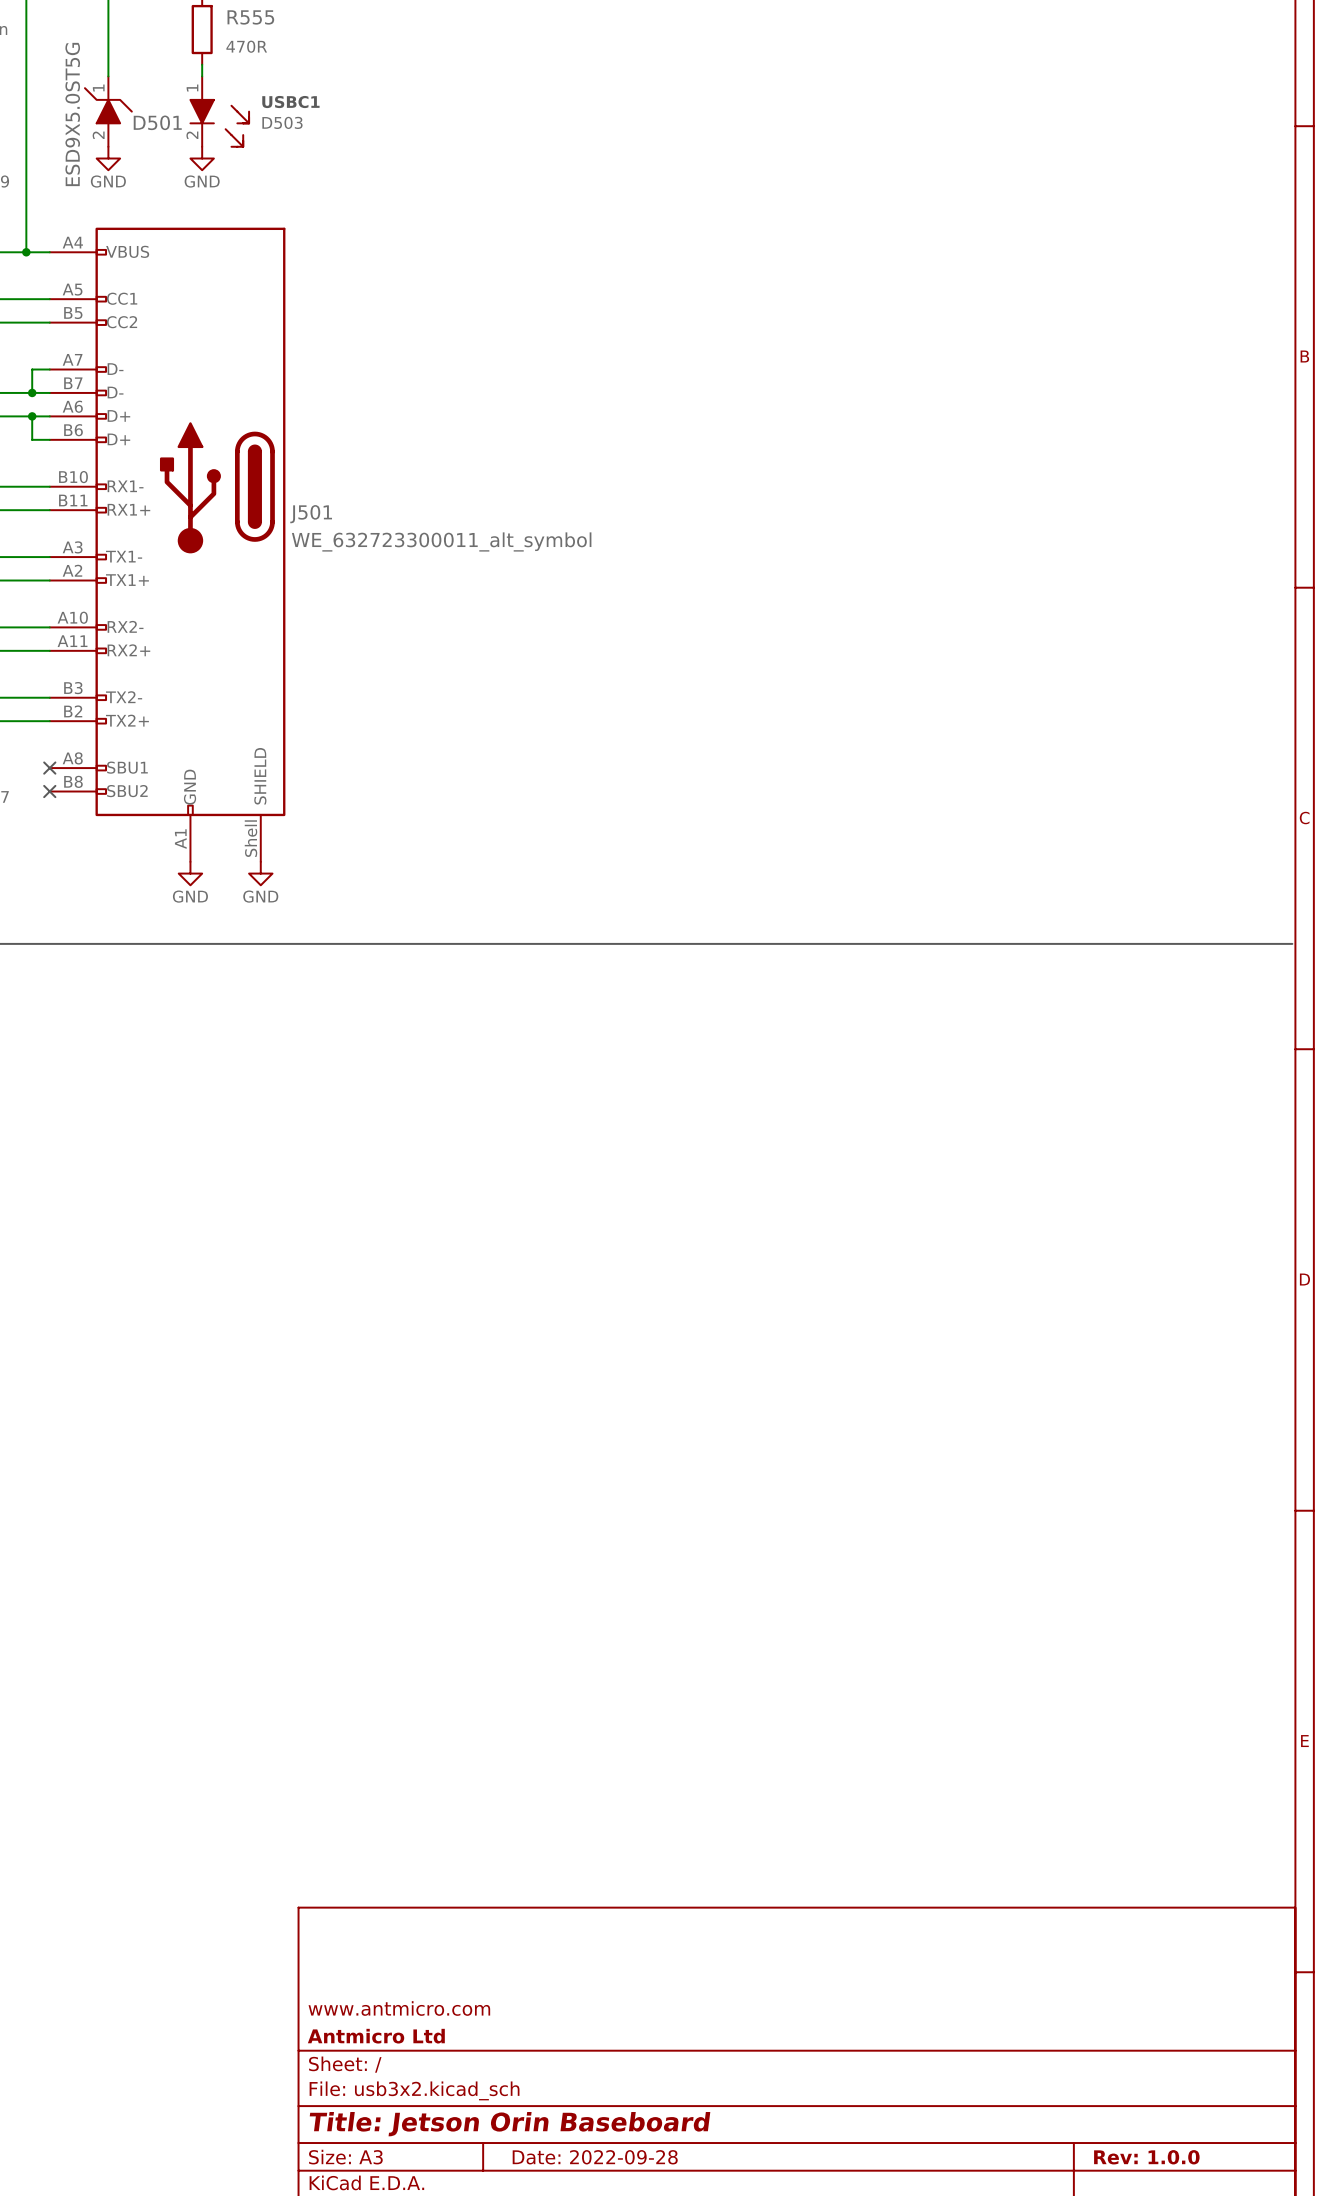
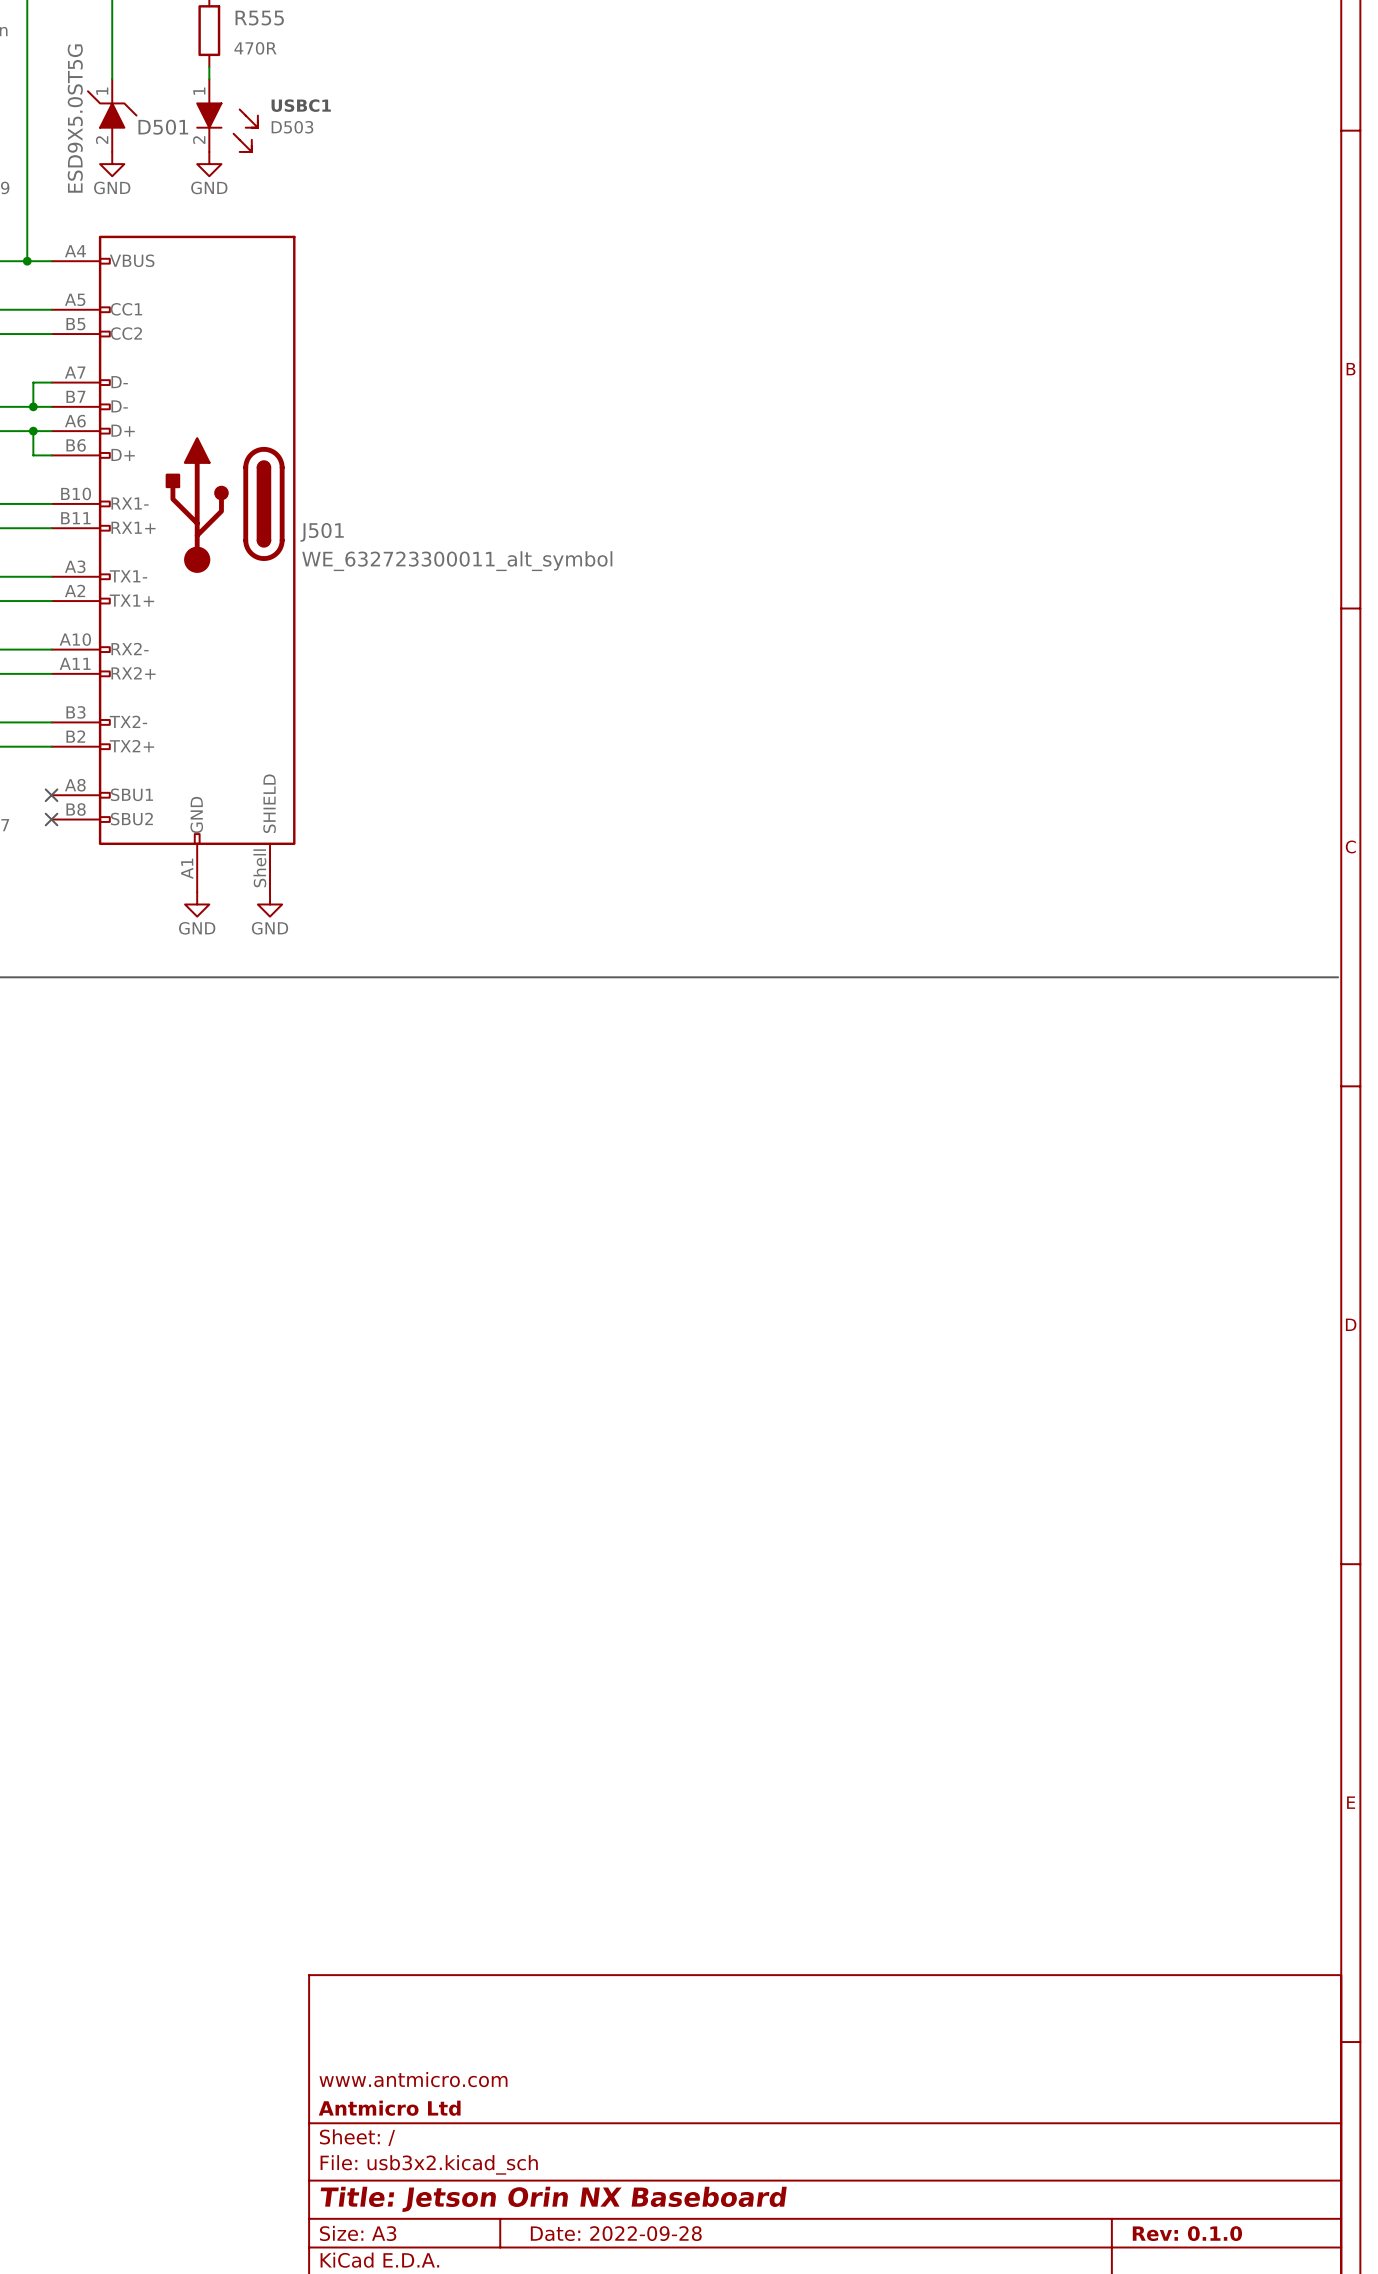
title block: Title: Jetson Orin Baseboard (510, 2124) -> Title: Jetson Orin NX Baseboard (553, 2199)
title block: Rev: 1.0.0 (1146, 2157) -> Rev: 0.1.0 (1187, 2233)

